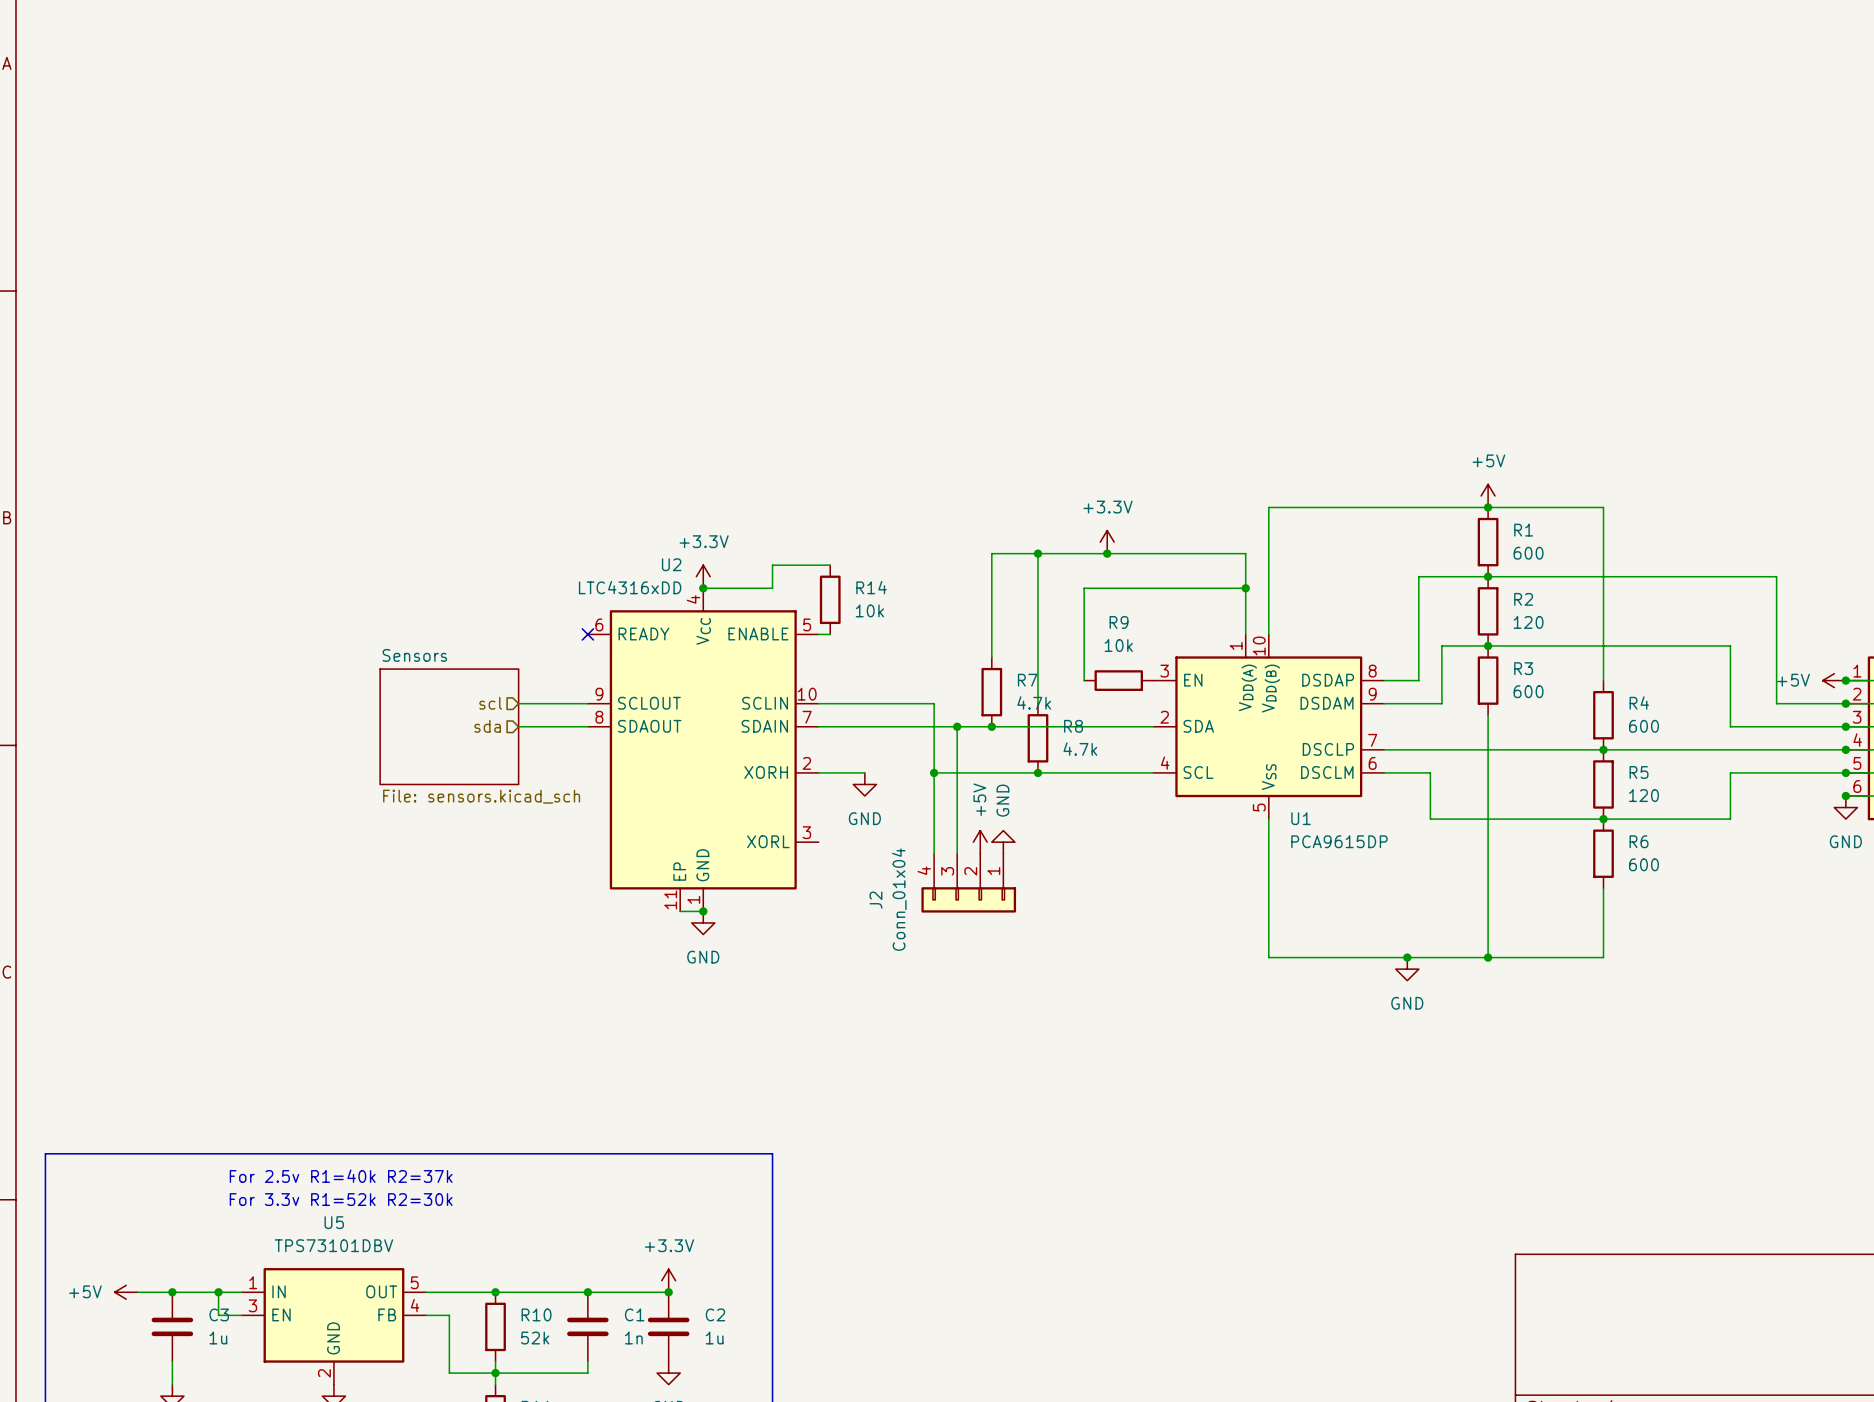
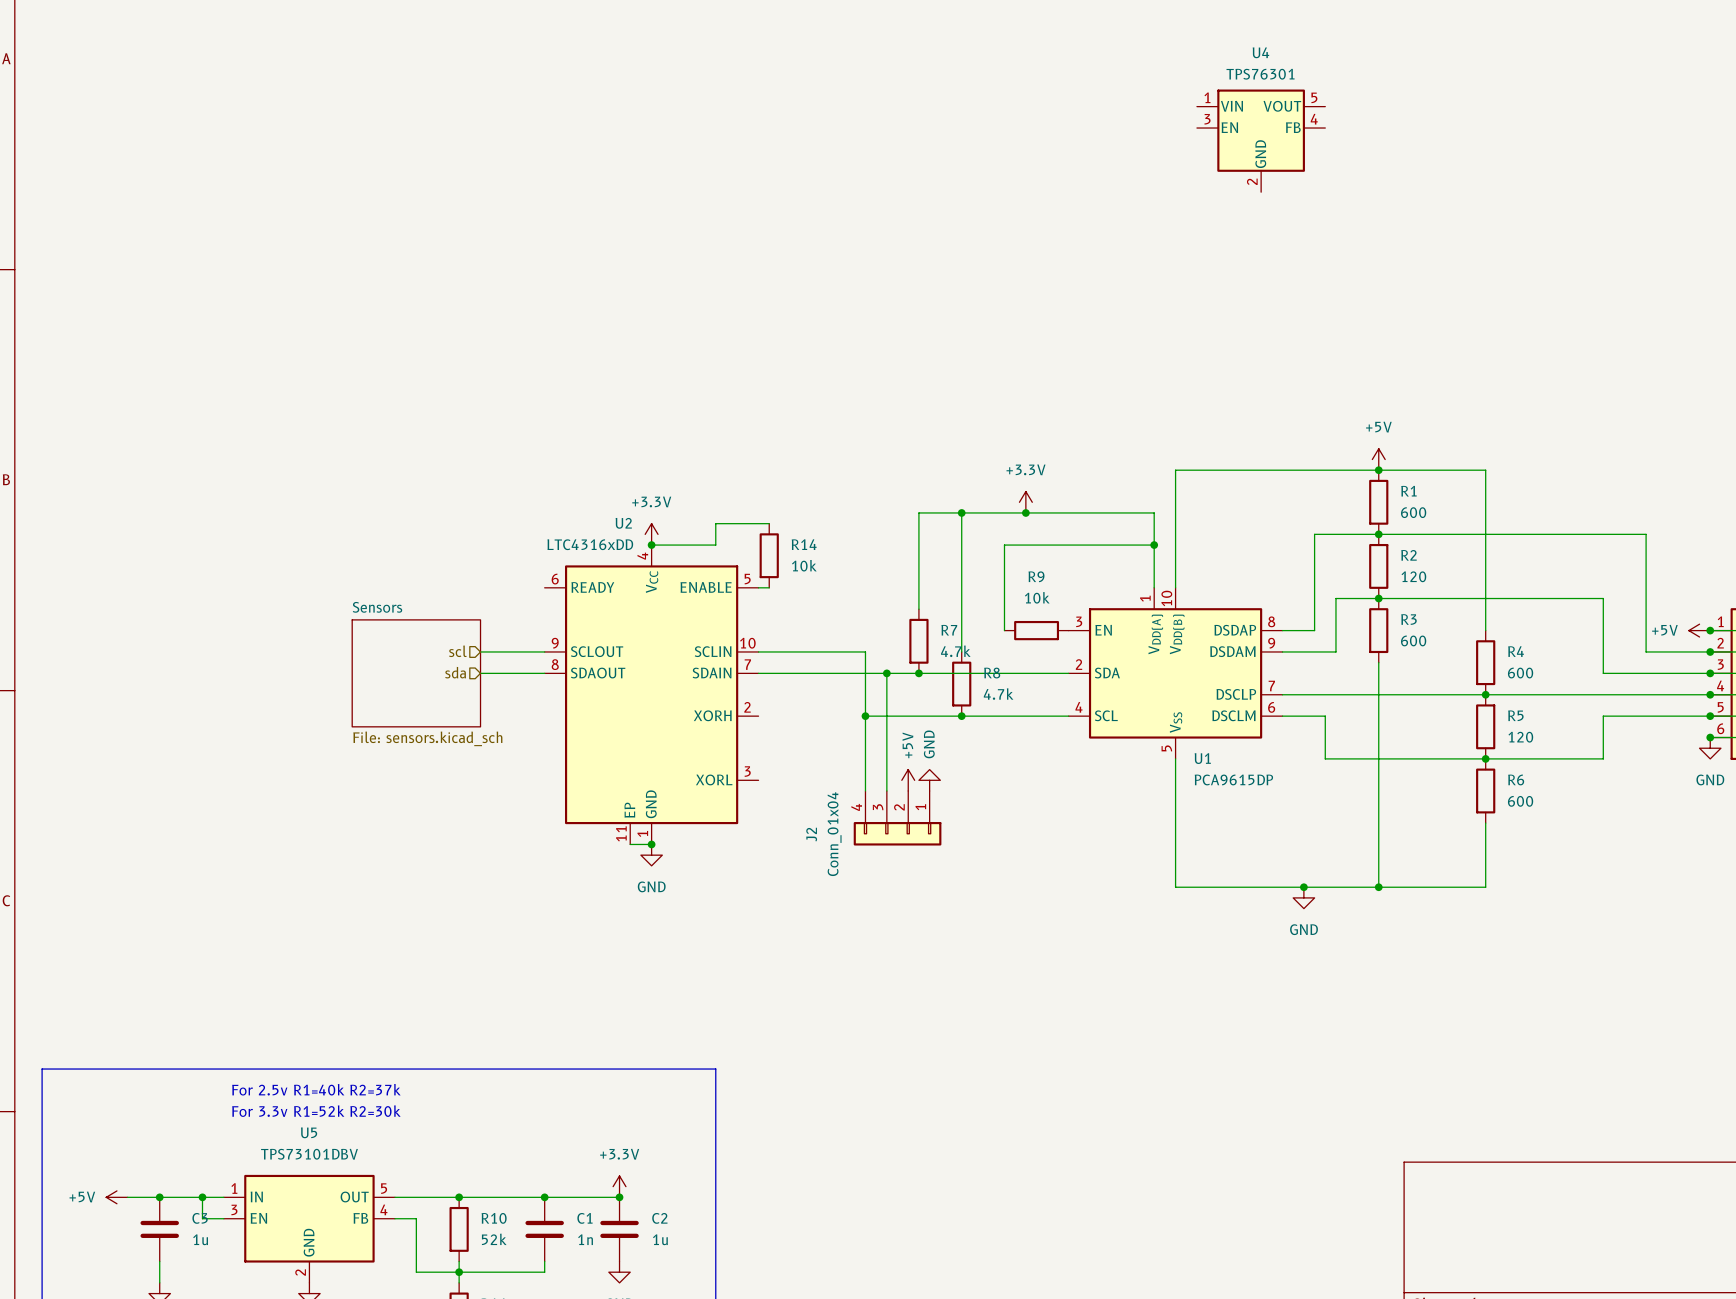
U4: none -> TPS76301 (1261, 140)
no-connect mark: (587, 634) -> none
wire: (818, 772) (864, 772) -> none
power symbol: GND (864, 784) -> none

